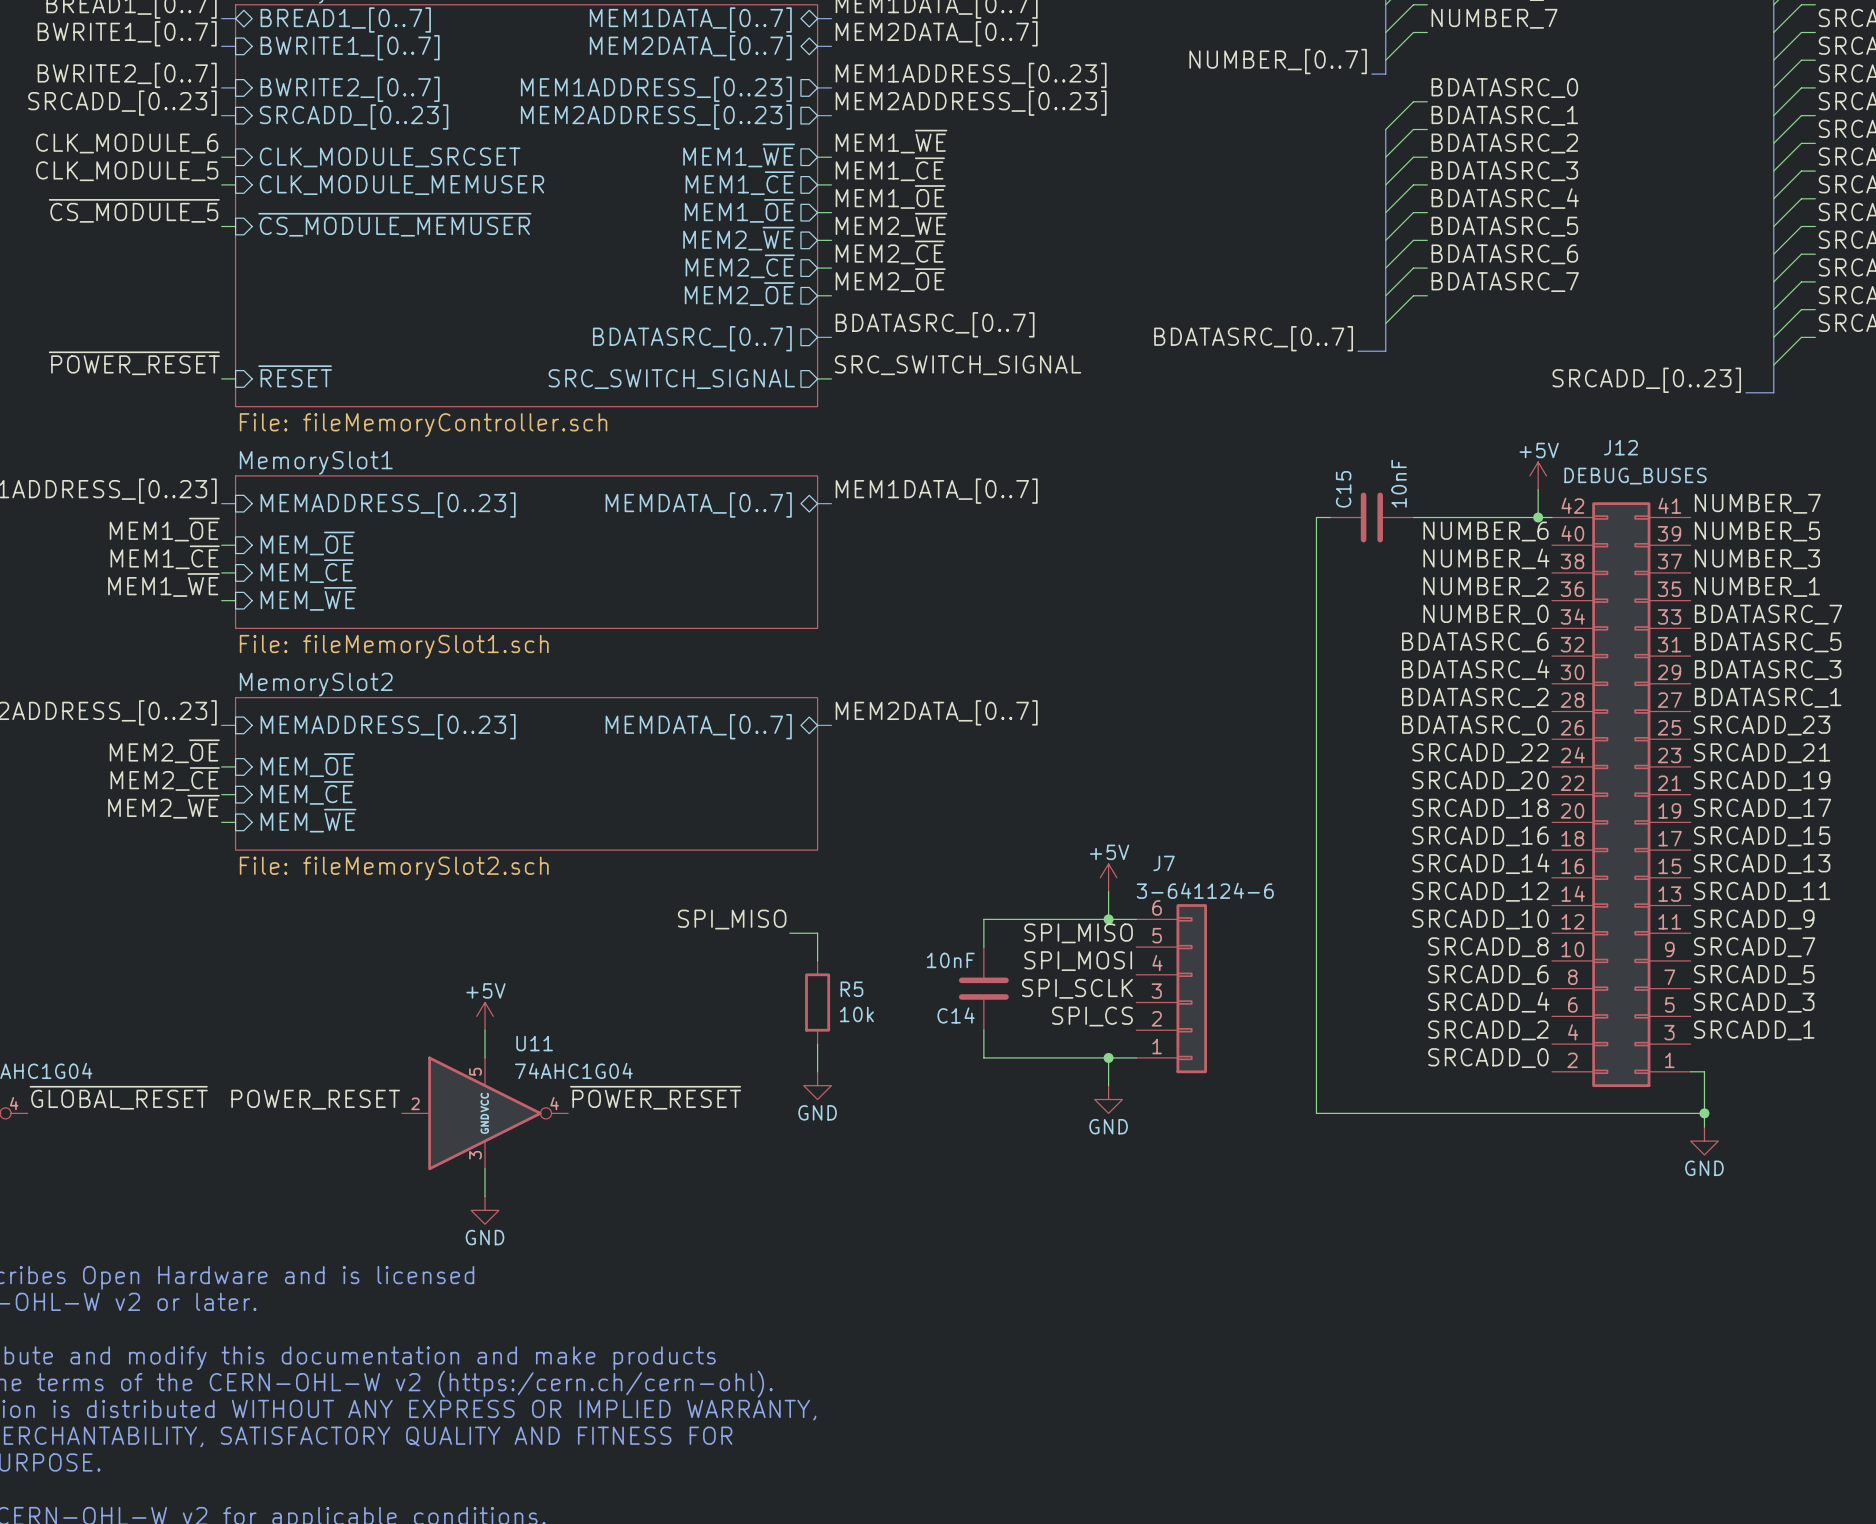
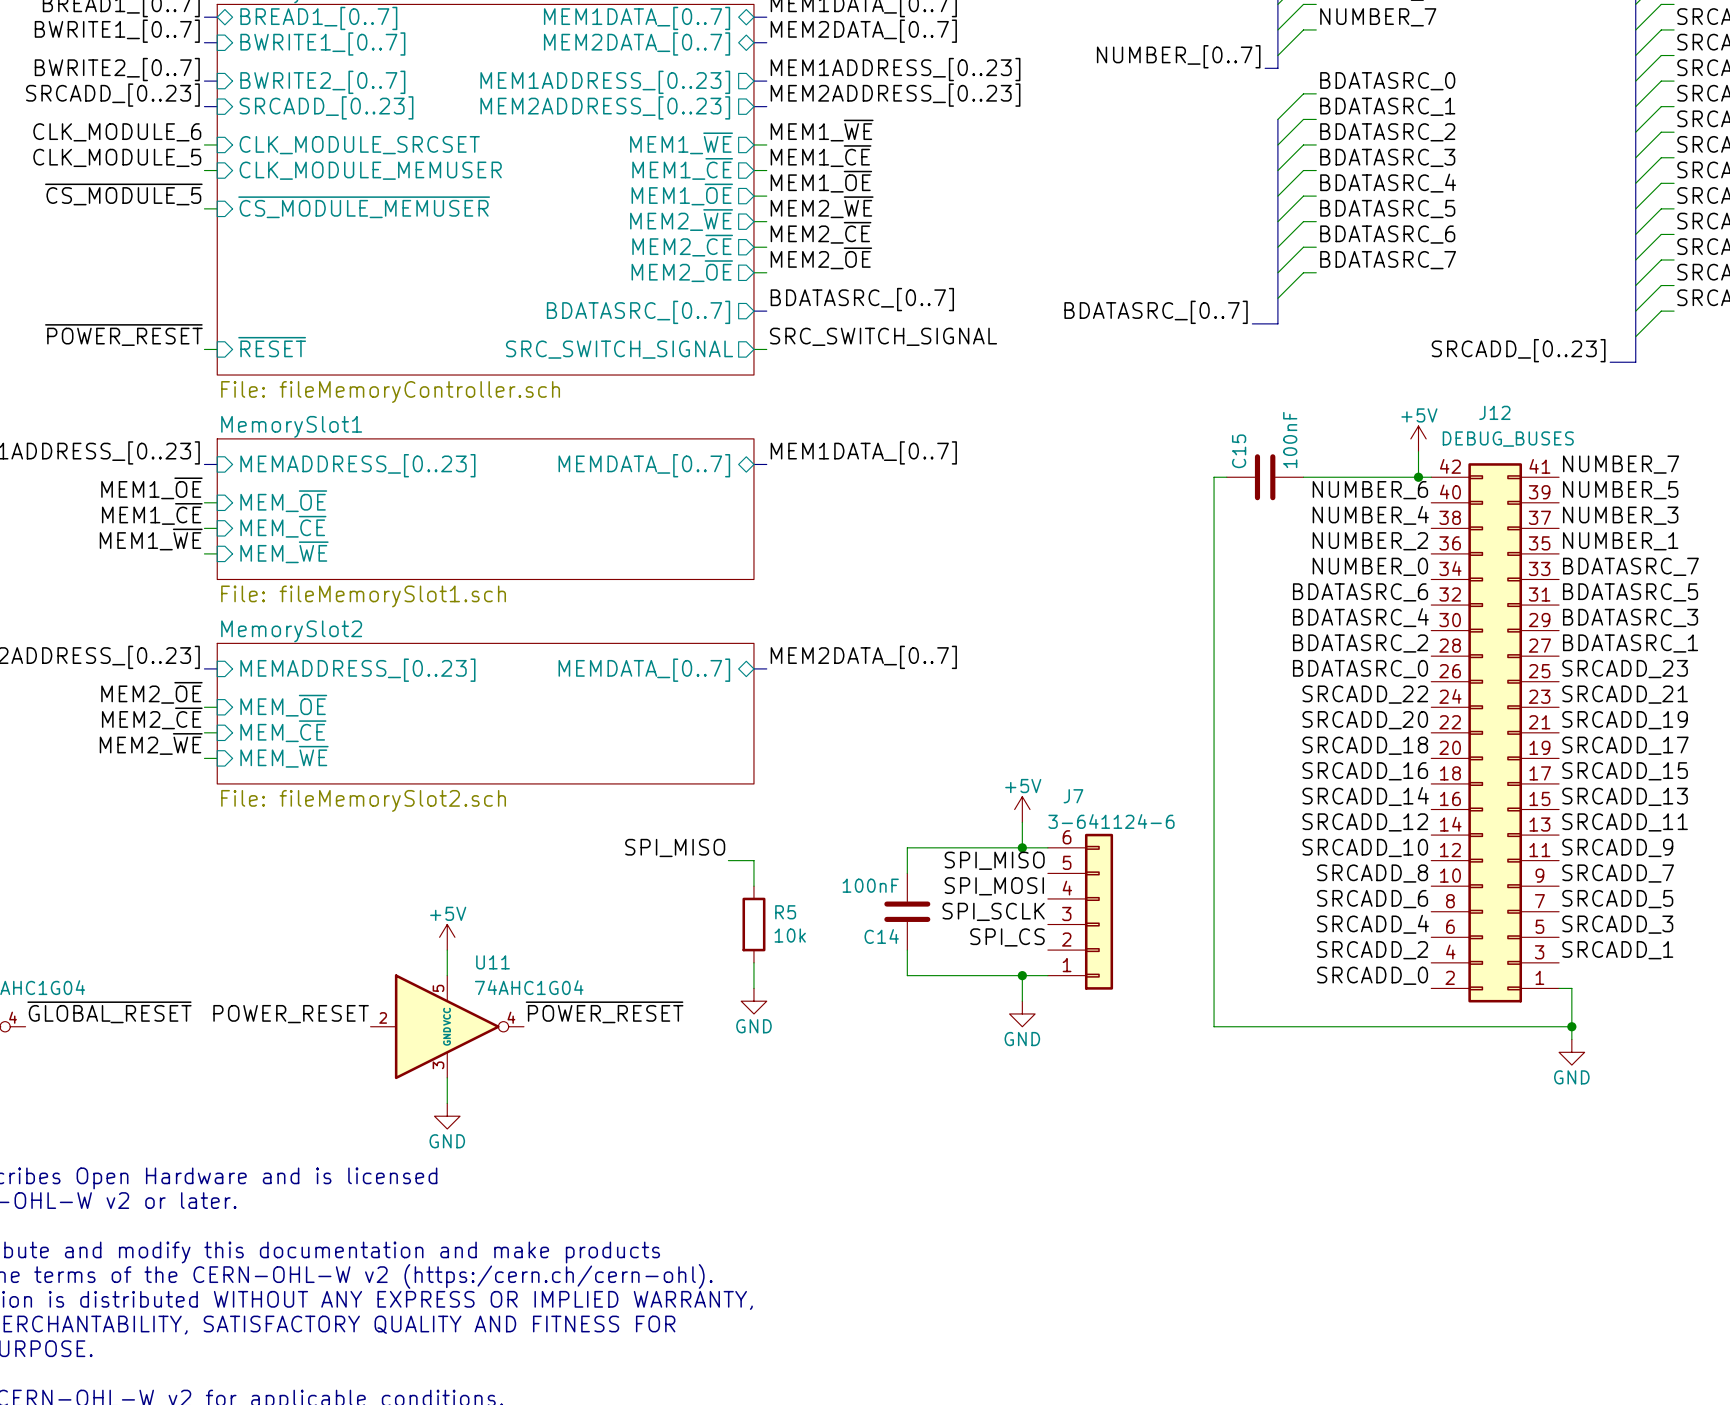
C15 value: 10nF (1399, 483) -> 100nF (1290, 440)
C14 value: 10nF (950, 960) -> 100nF (870, 885)

